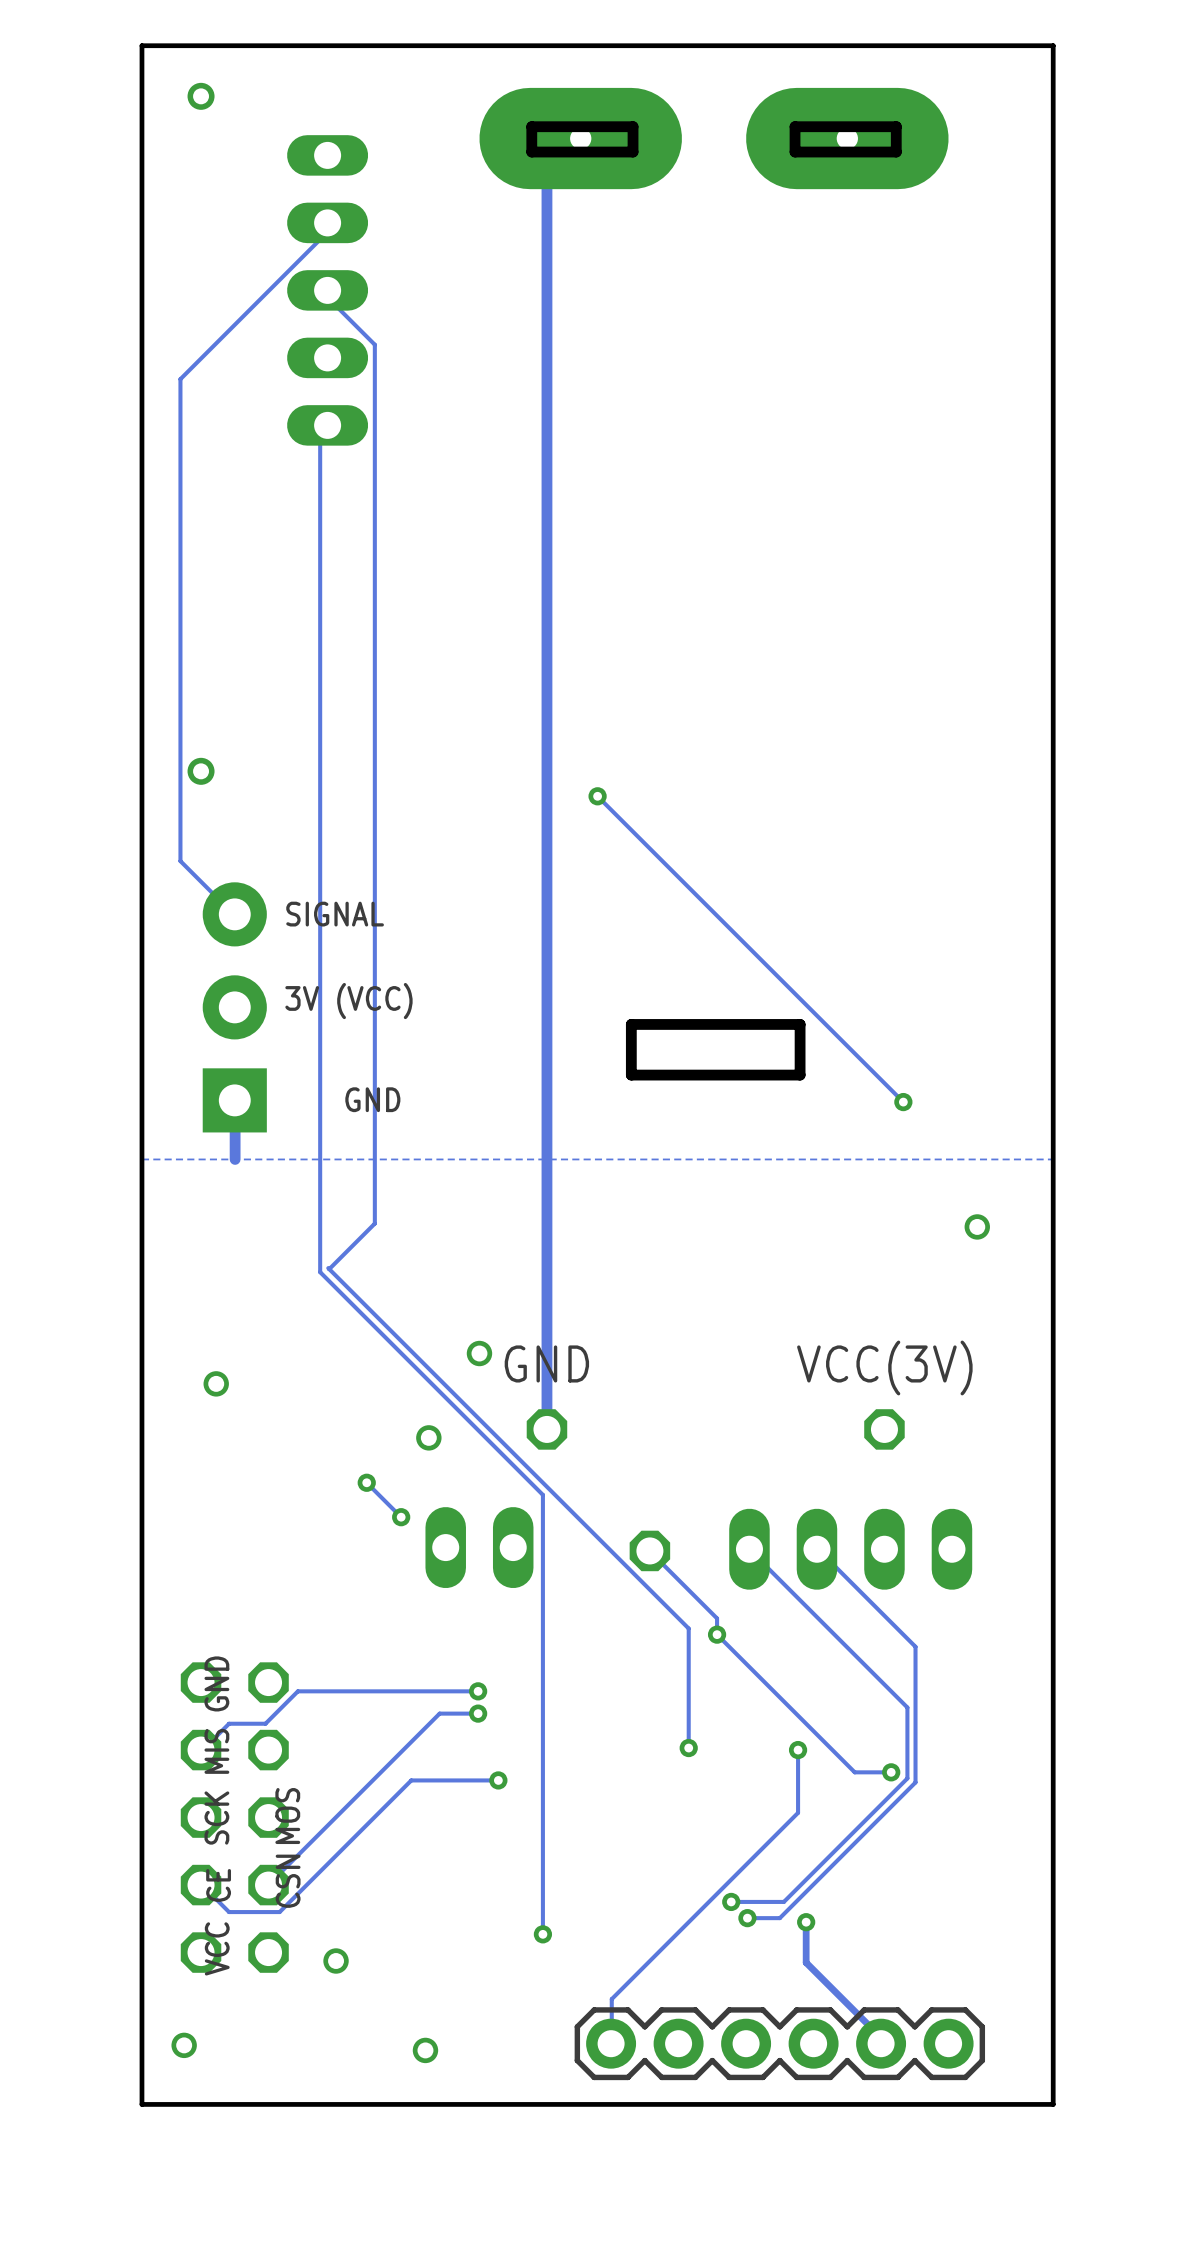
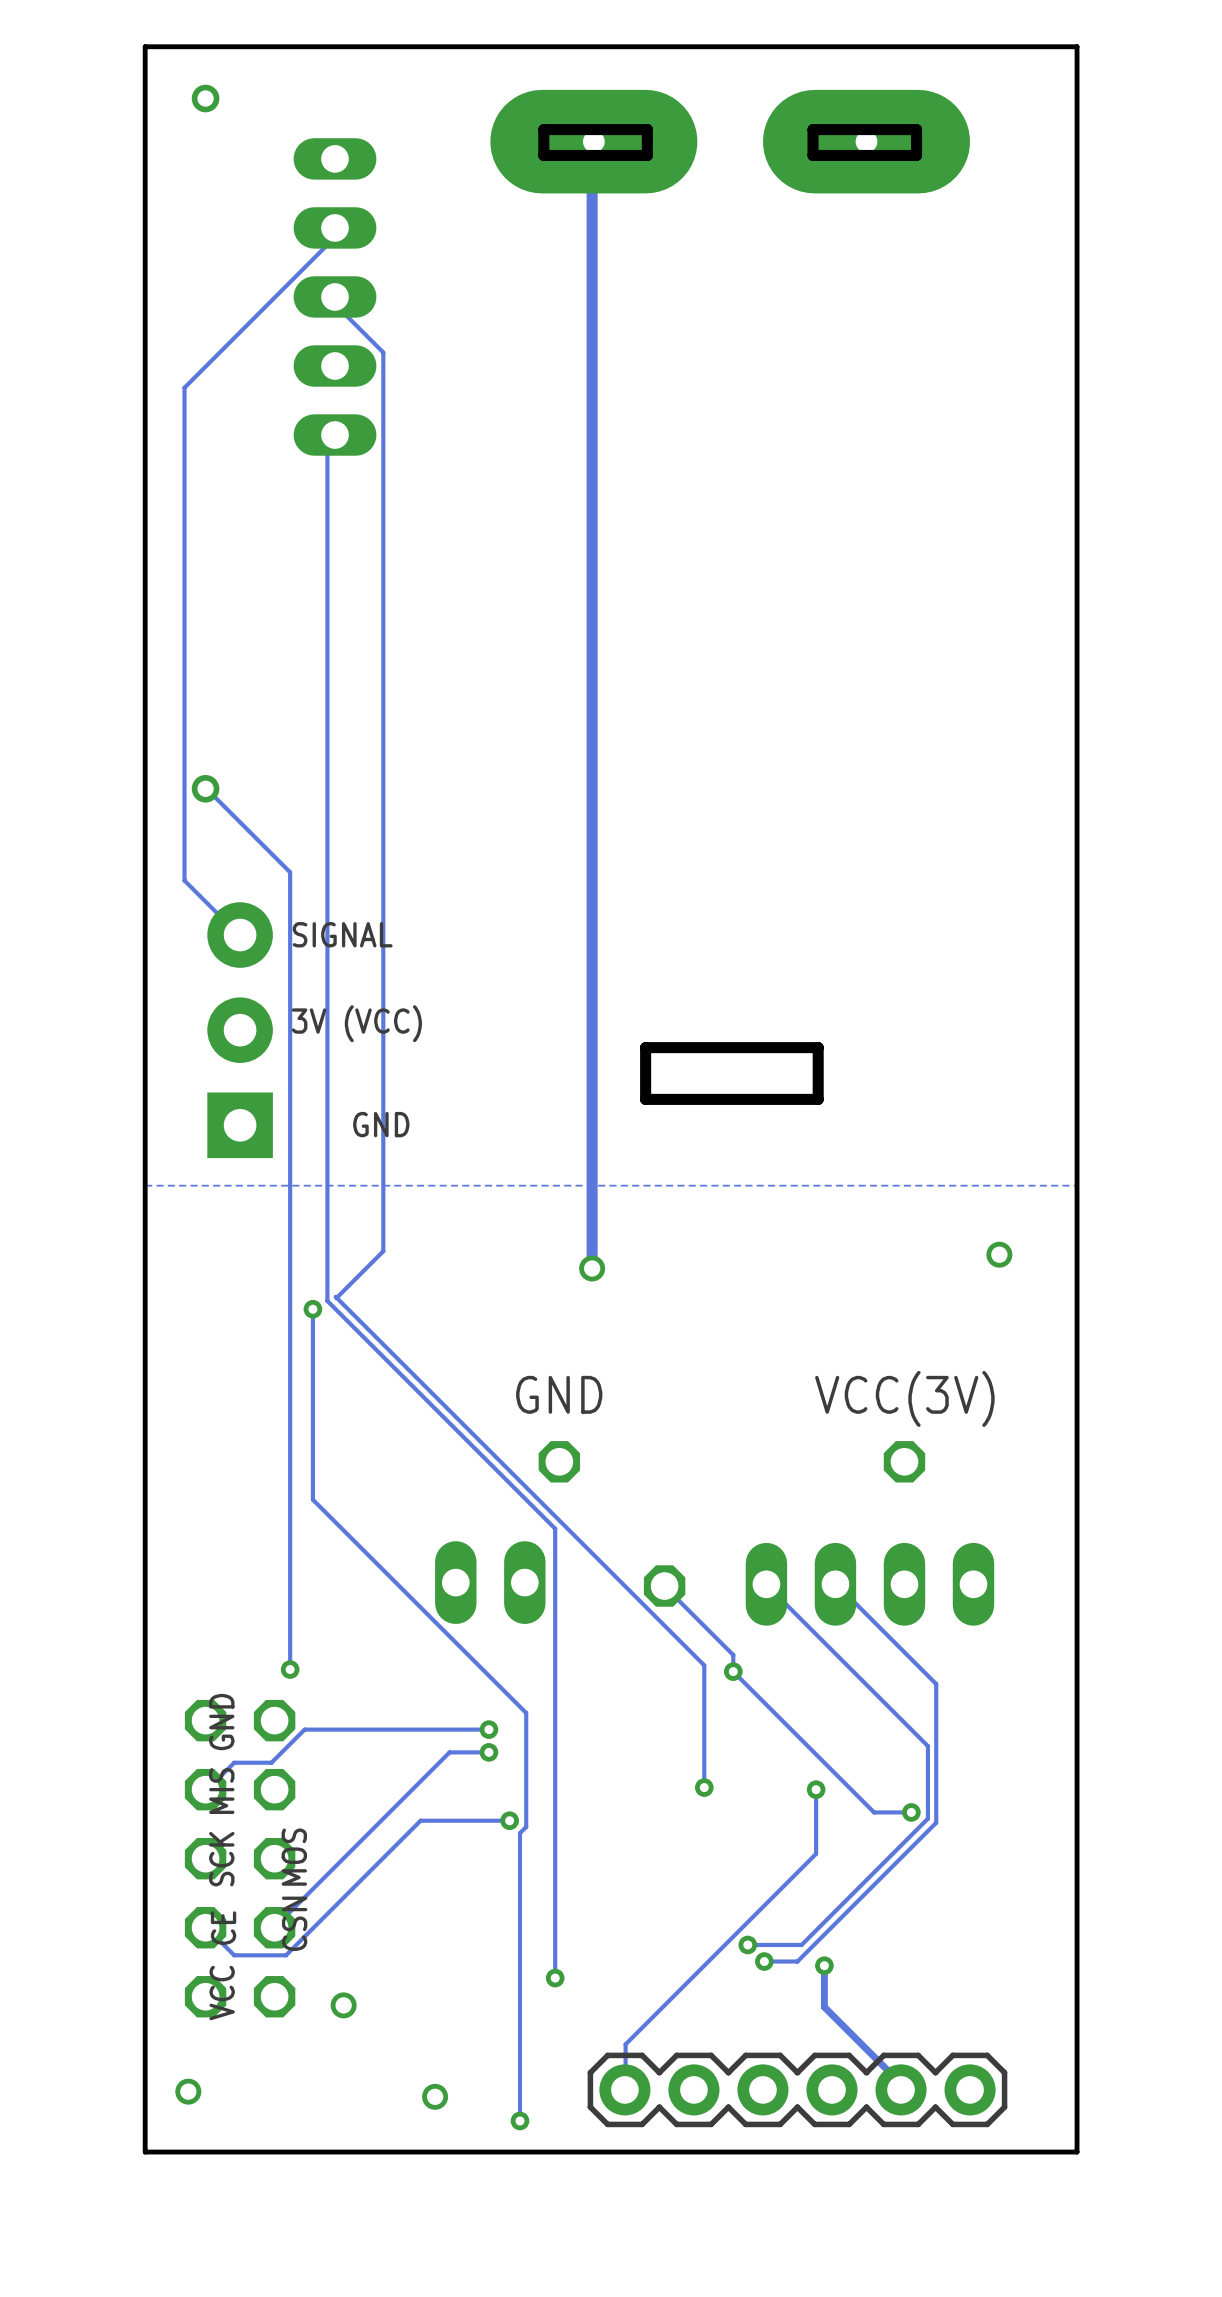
track: (580, 138) (546, 138) (546, 1429) -> (593, 141) (592, 162) (592, 1268)
track: none -> (205, 788) (290, 872) (290, 1669)
track: (597, 796) (903, 1102) -> none
via: (597, 796) -> none
track: (234, 1100) (235, 1159) -> none
via: (903, 1102) -> none
via: none -> (592, 1268)
track: none -> (312, 1309) (312, 1499) (526, 1713) (526, 1826) (520, 1833) (520, 2120)
via: none -> (312, 1309)
via: (479, 1353) -> none
via: (216, 1383) -> none
via: (428, 1437) -> none
track: (366, 1482) (401, 1517) -> none
via: (366, 1482) -> none
via: (401, 1517) -> none
via: none -> (290, 1669)
via: none -> (520, 2120)

